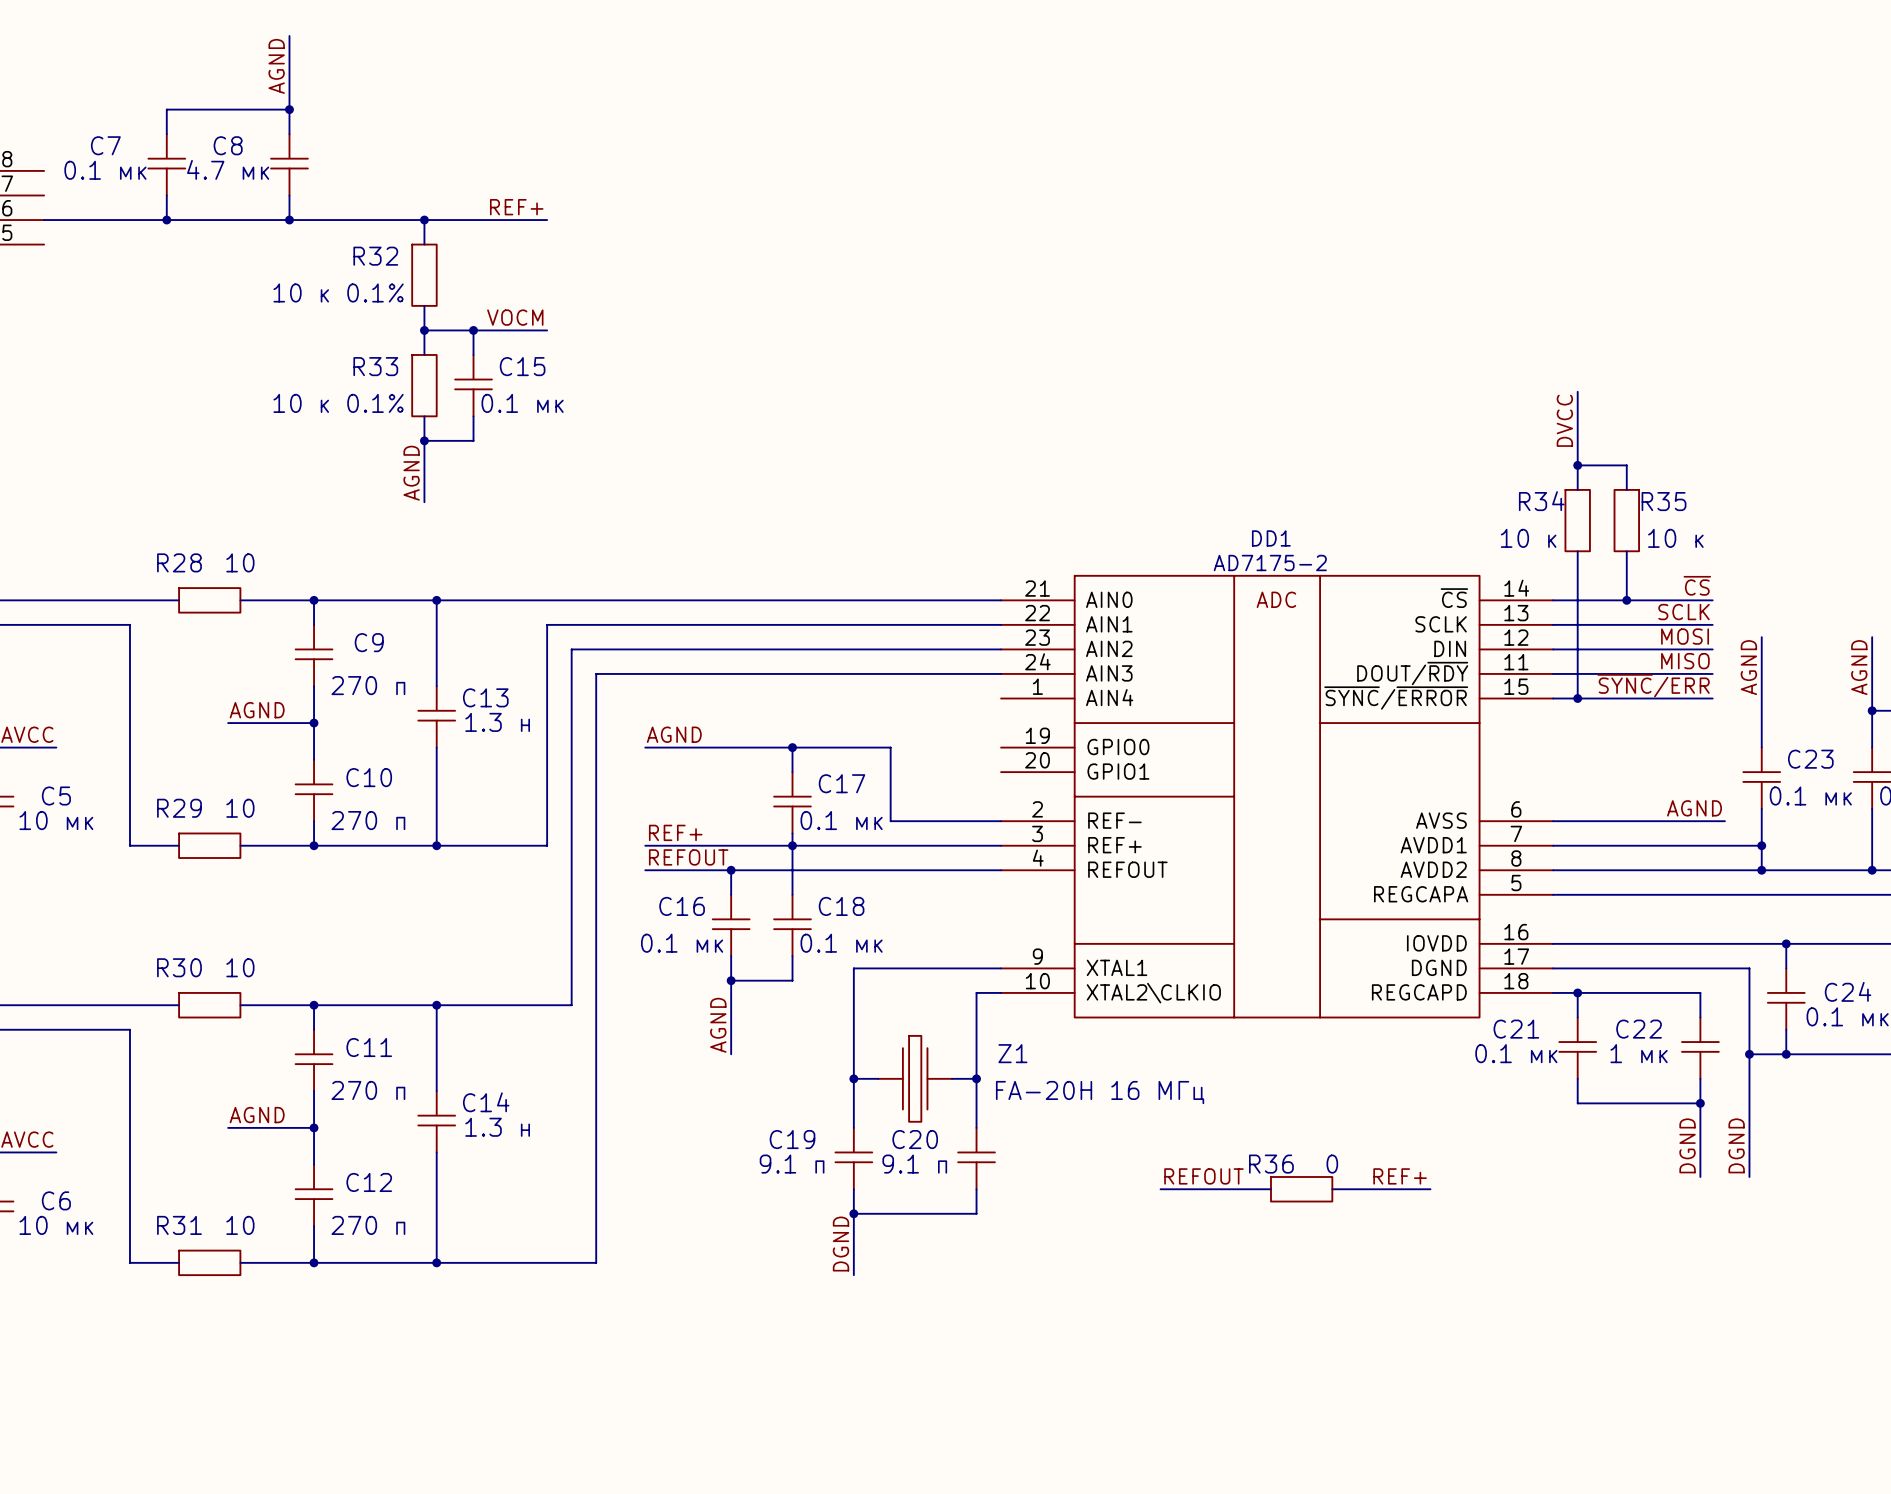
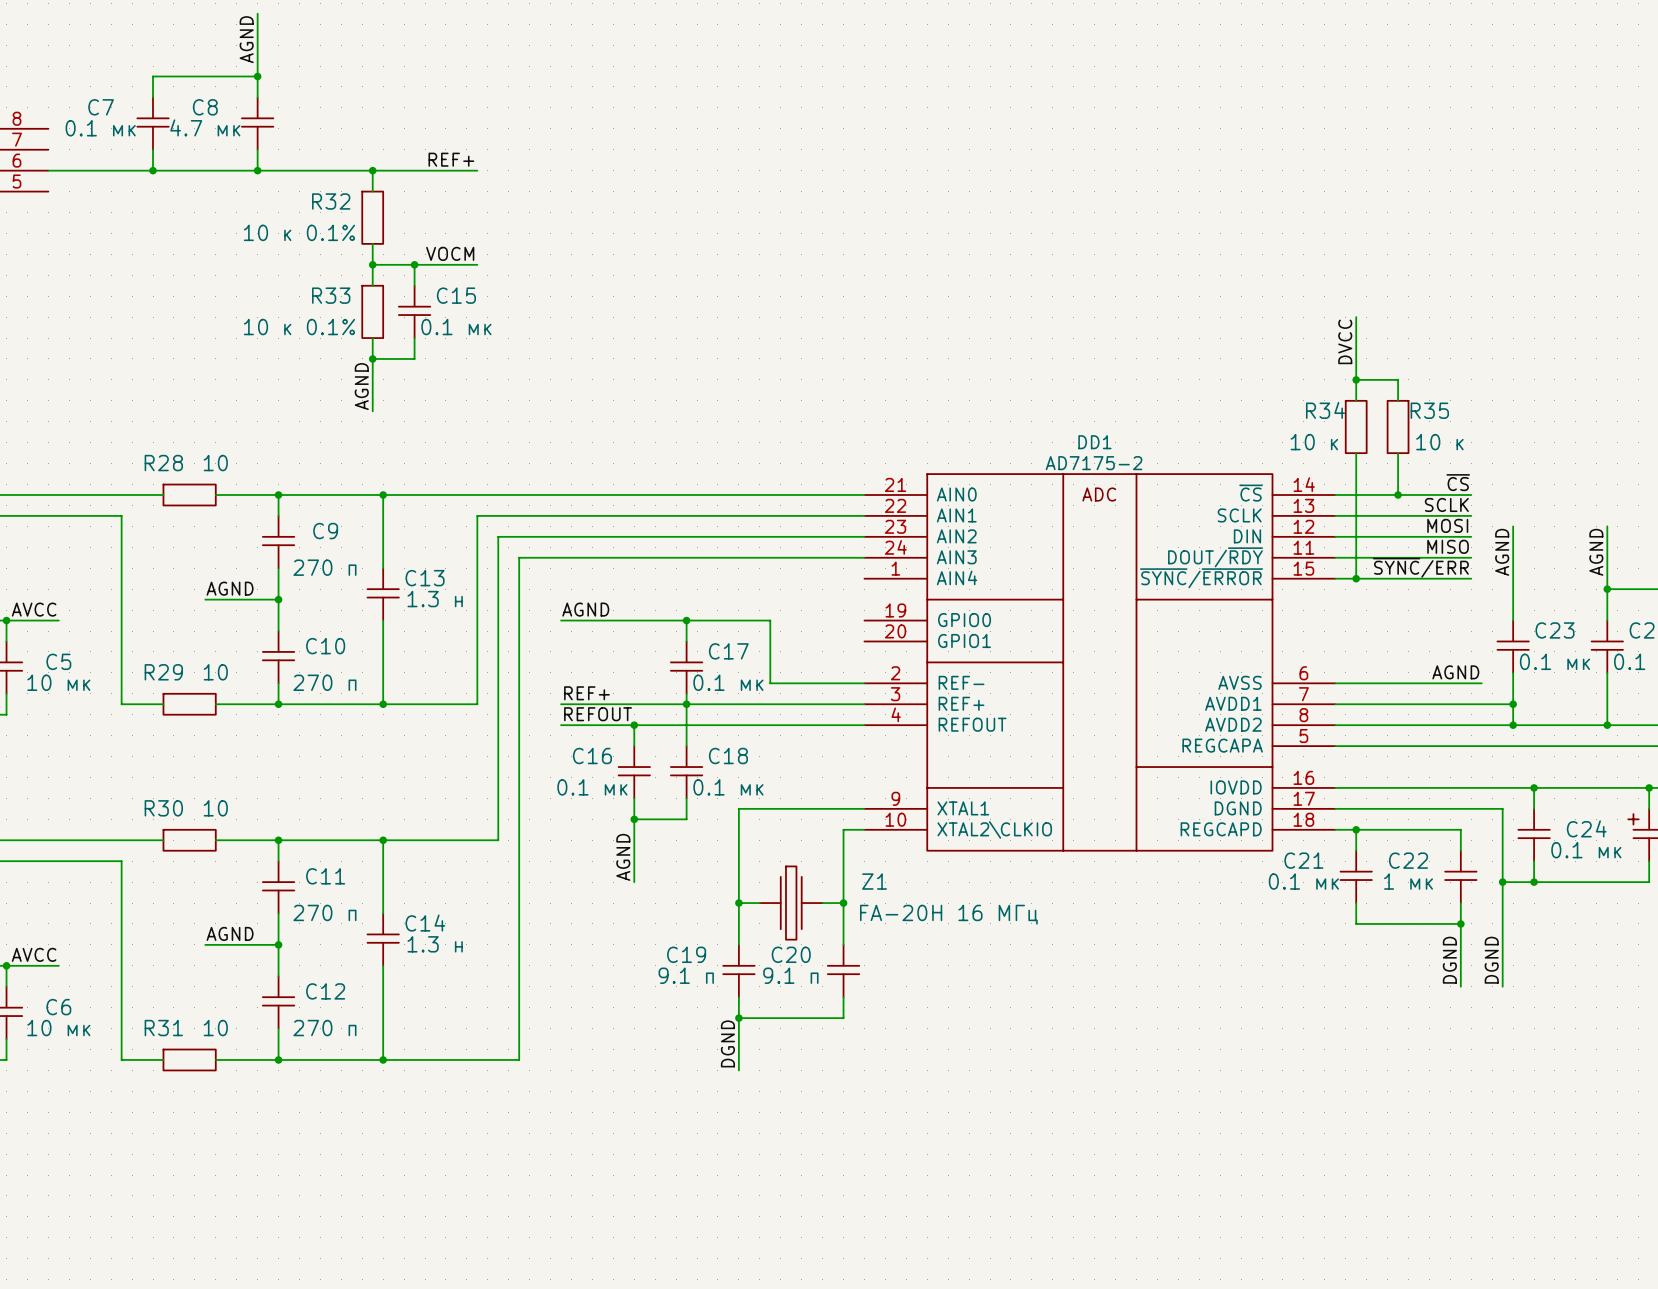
label: REFOUT (1203, 1176) -> none
label: REF+ (1400, 1176) -> none
wire: (1160, 1189) (1270, 1189) -> none
R36: 0 (1301, 1189) -> none
wire: (1332, 1189) (1430, 1189) -> none

